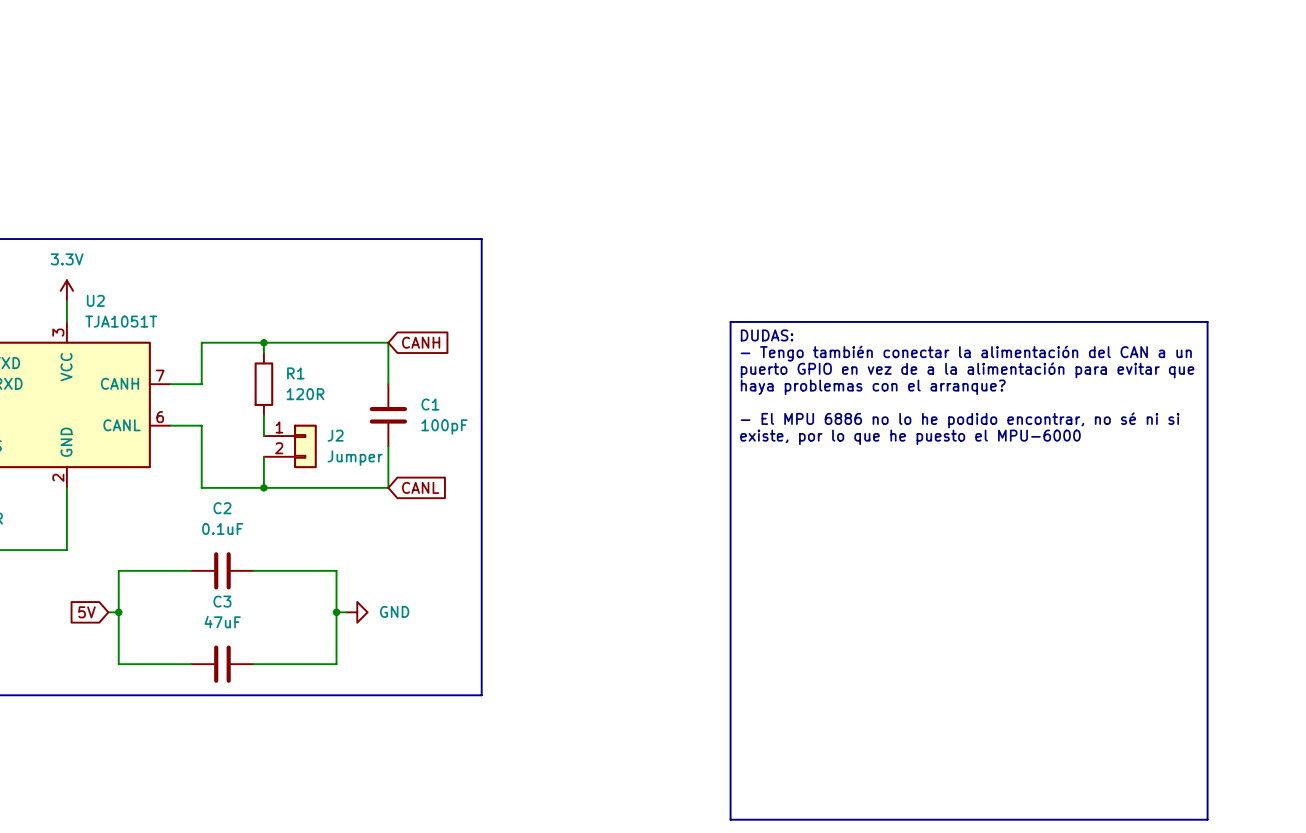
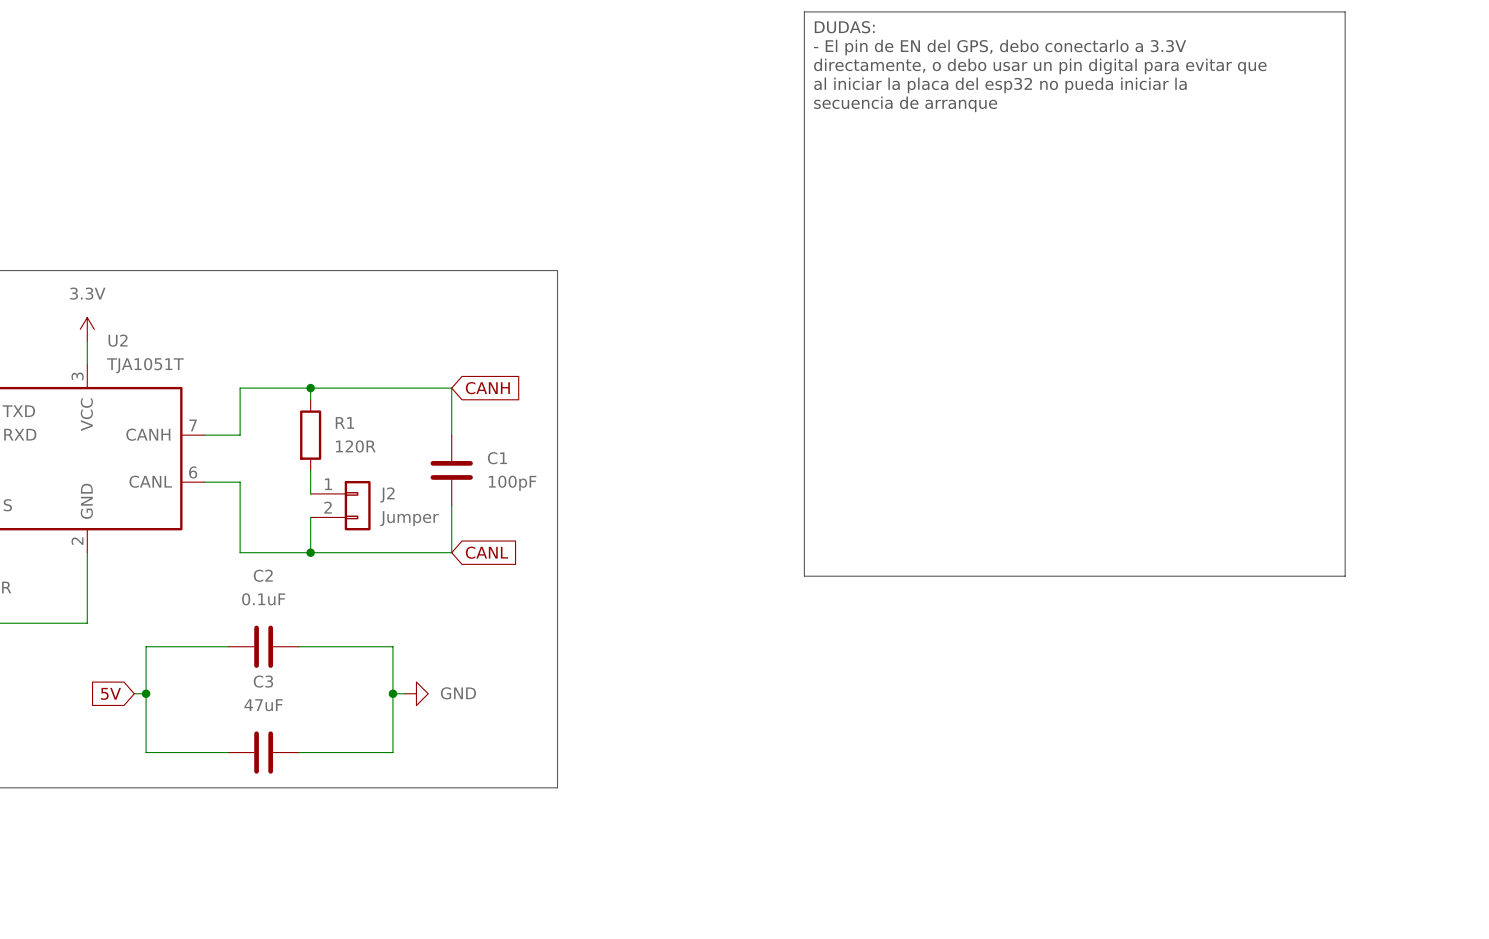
line: none -> (804, 11) (1345, 11) (1345, 576) (804, 576) (804, 11)
text: none -> DUDAS: (844, 27)
text: none -> - El pin de EN del GPS, debo conectarlo a 3.3V (1000, 47)
text: none -> directamente, o debo usar un pin digital para evitar que (1040, 66)
text: none -> al iniciar la placa del esp32 no pueda iniciar la (1000, 85)
text: none -> secuencia de arranque (905, 104)
line: (730, 321) (1207, 321) (1207, 819) (730, 819) (730, 321) -> none
text: DUDAS: (767, 335) -> none
text: - Tengo también conectar la alimentación del CAN a un (966, 353) -> none
text: puerto GPIO en vez de a la alimentación para evitar que (967, 370) -> none
text: haya problemas con el arranque? (873, 387) -> none
text: - El MPU 6886 no lo he podido encontrar, no sé ni si (960, 420) -> none
text: existe, por lo que he puesto el MPU-6000 (910, 437) -> none

